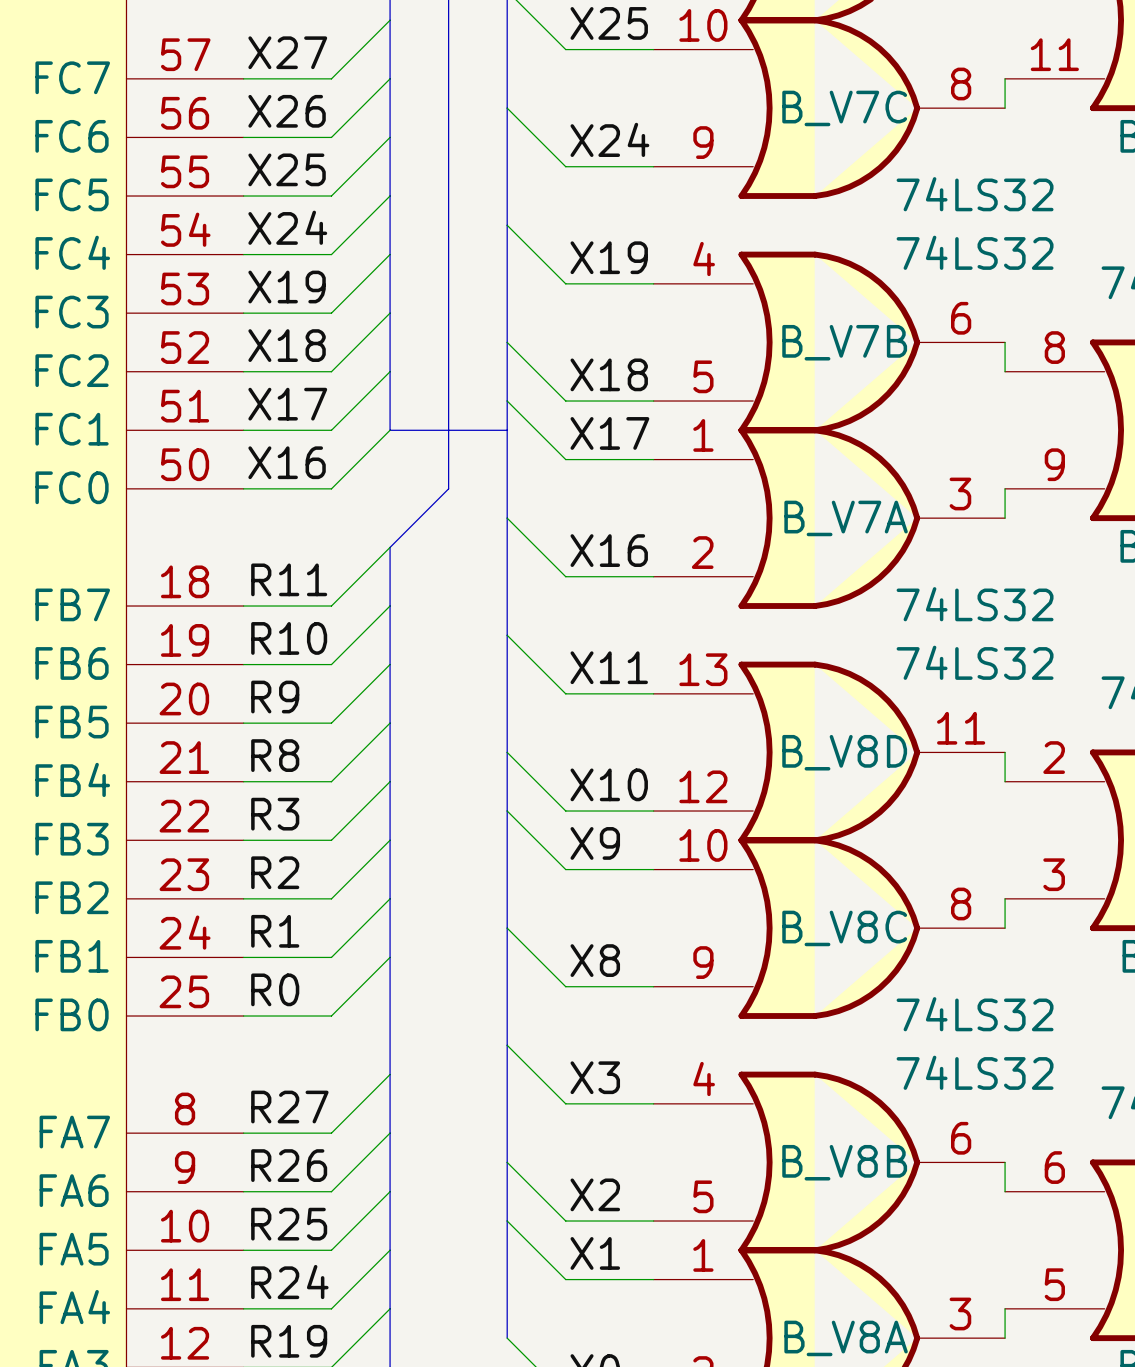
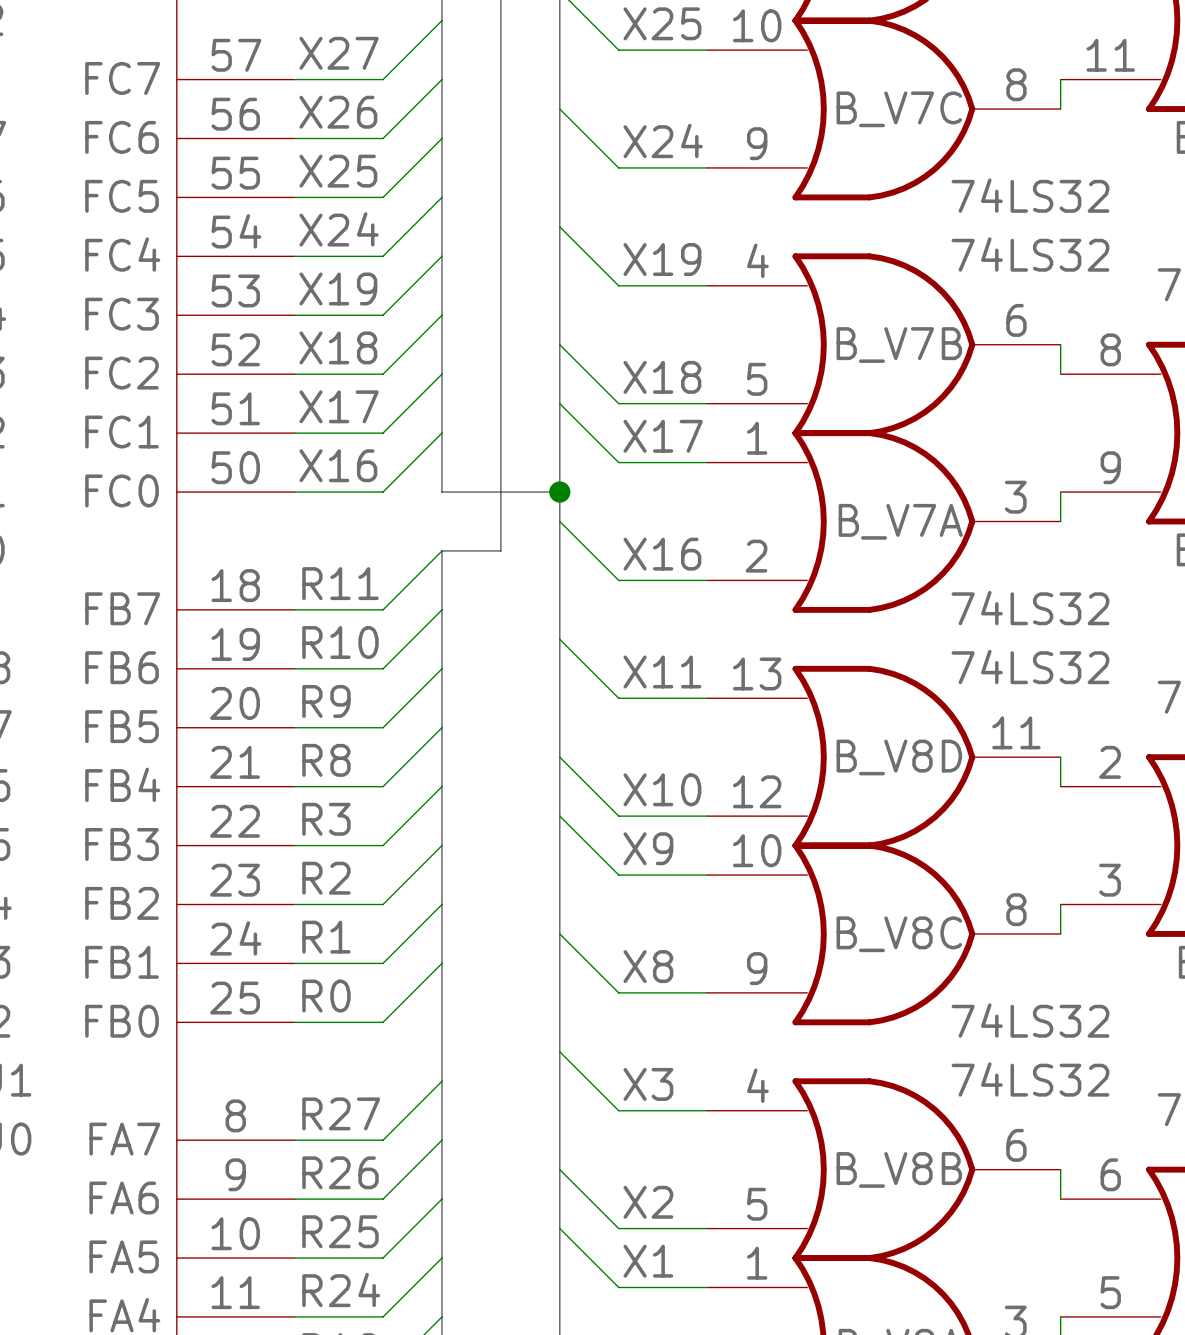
bus: (390, 430) (507, 430) -> (441, 433) (441, 492) (559, 492)
bus: (448, 488) (390, 547) -> (500, 492) (500, 550) (441, 550)
junction: none -> (559, 492)

